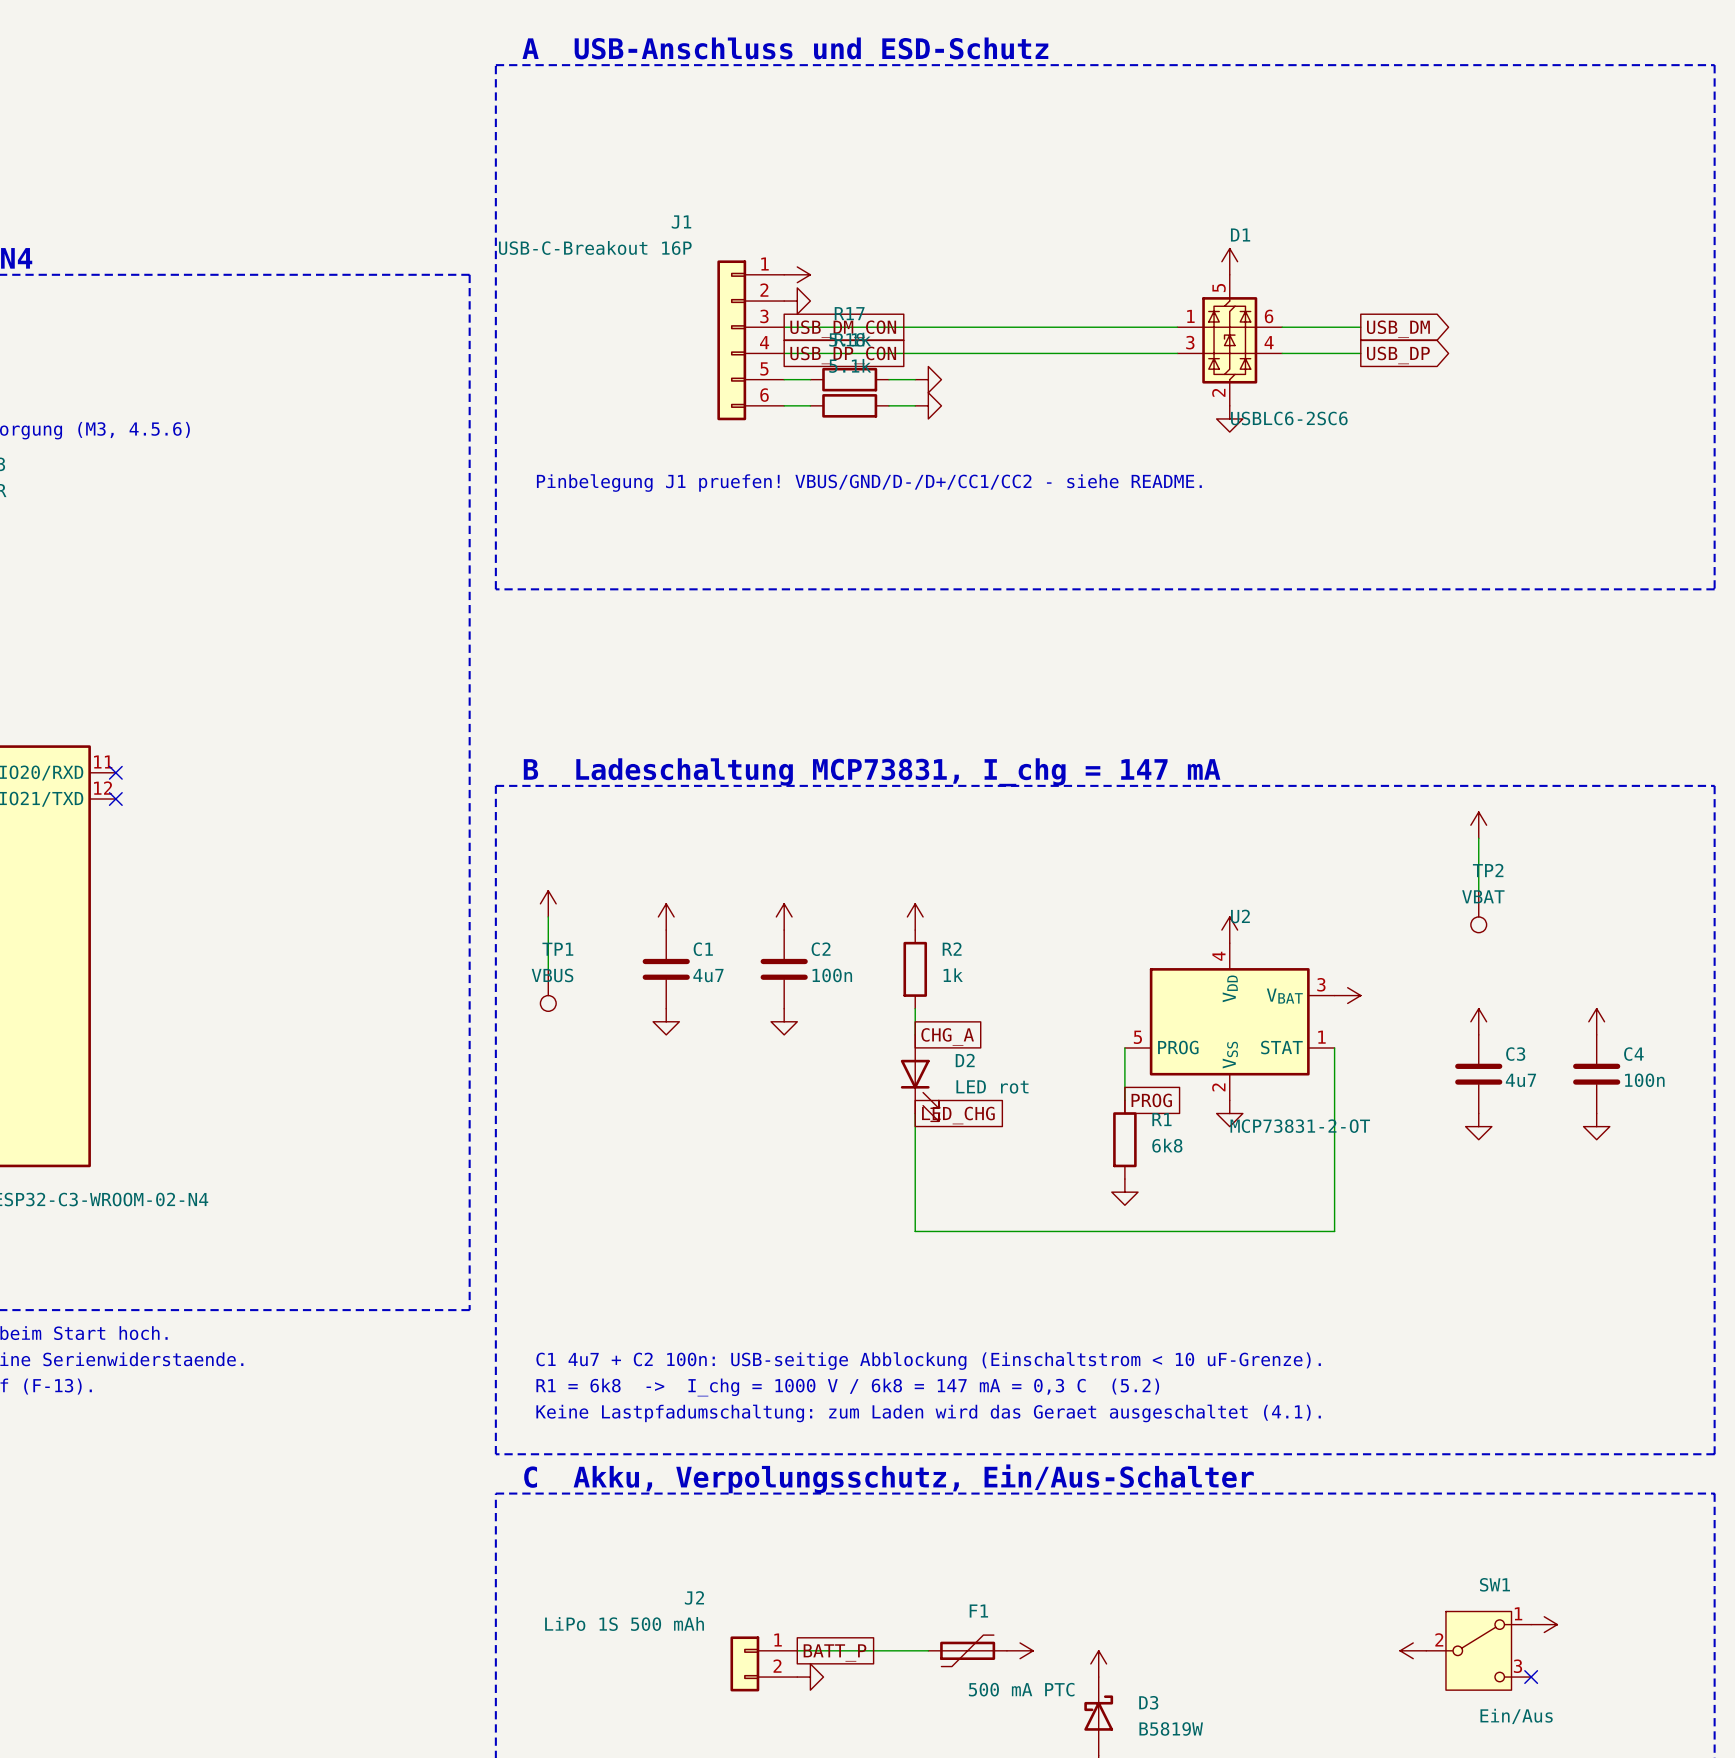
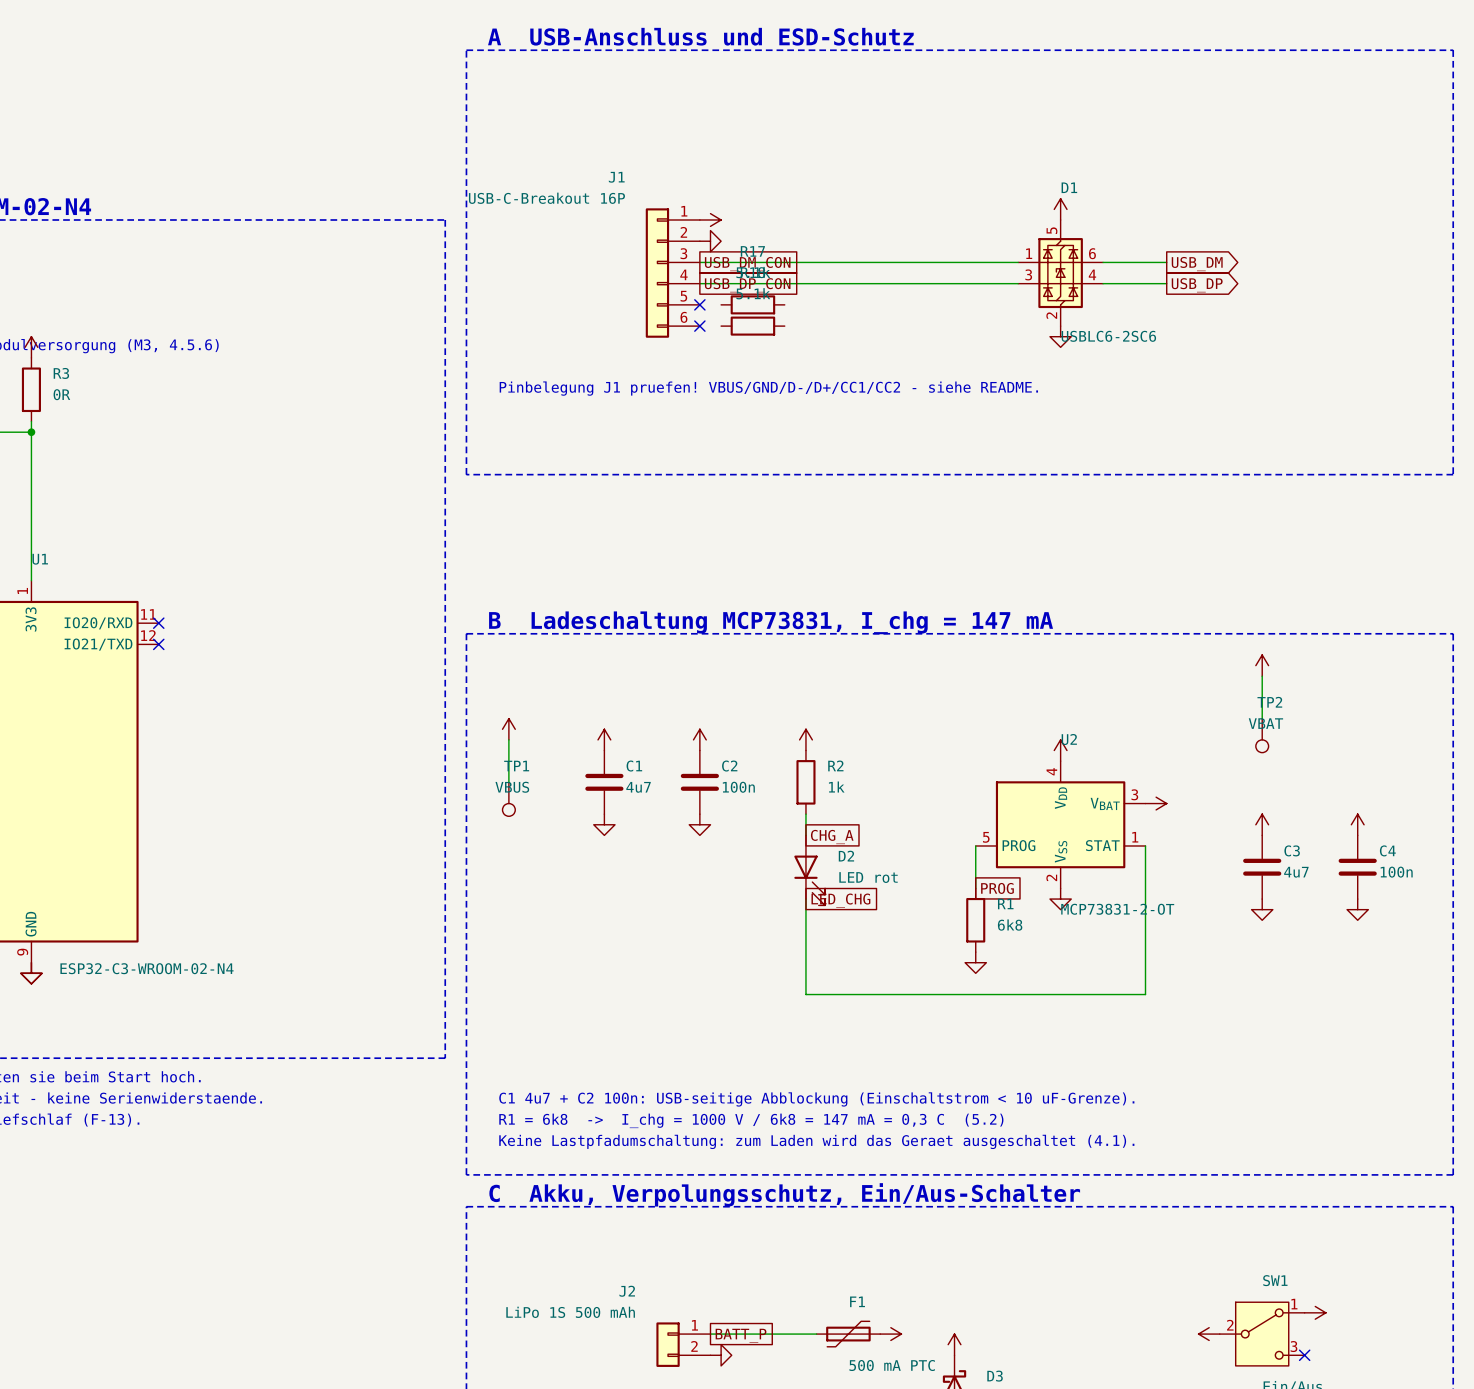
wire: (784, 379) (810, 379) -> none
no-connect mark: none -> (699, 304)
wire: (889, 379) (915, 379) -> none
power symbol: (928, 379) -> none
wire: (784, 405) (810, 405) -> none
no-connect mark: none -> (699, 326)
wire: (889, 405) (915, 405) -> none
power symbol: (928, 405) -> none

